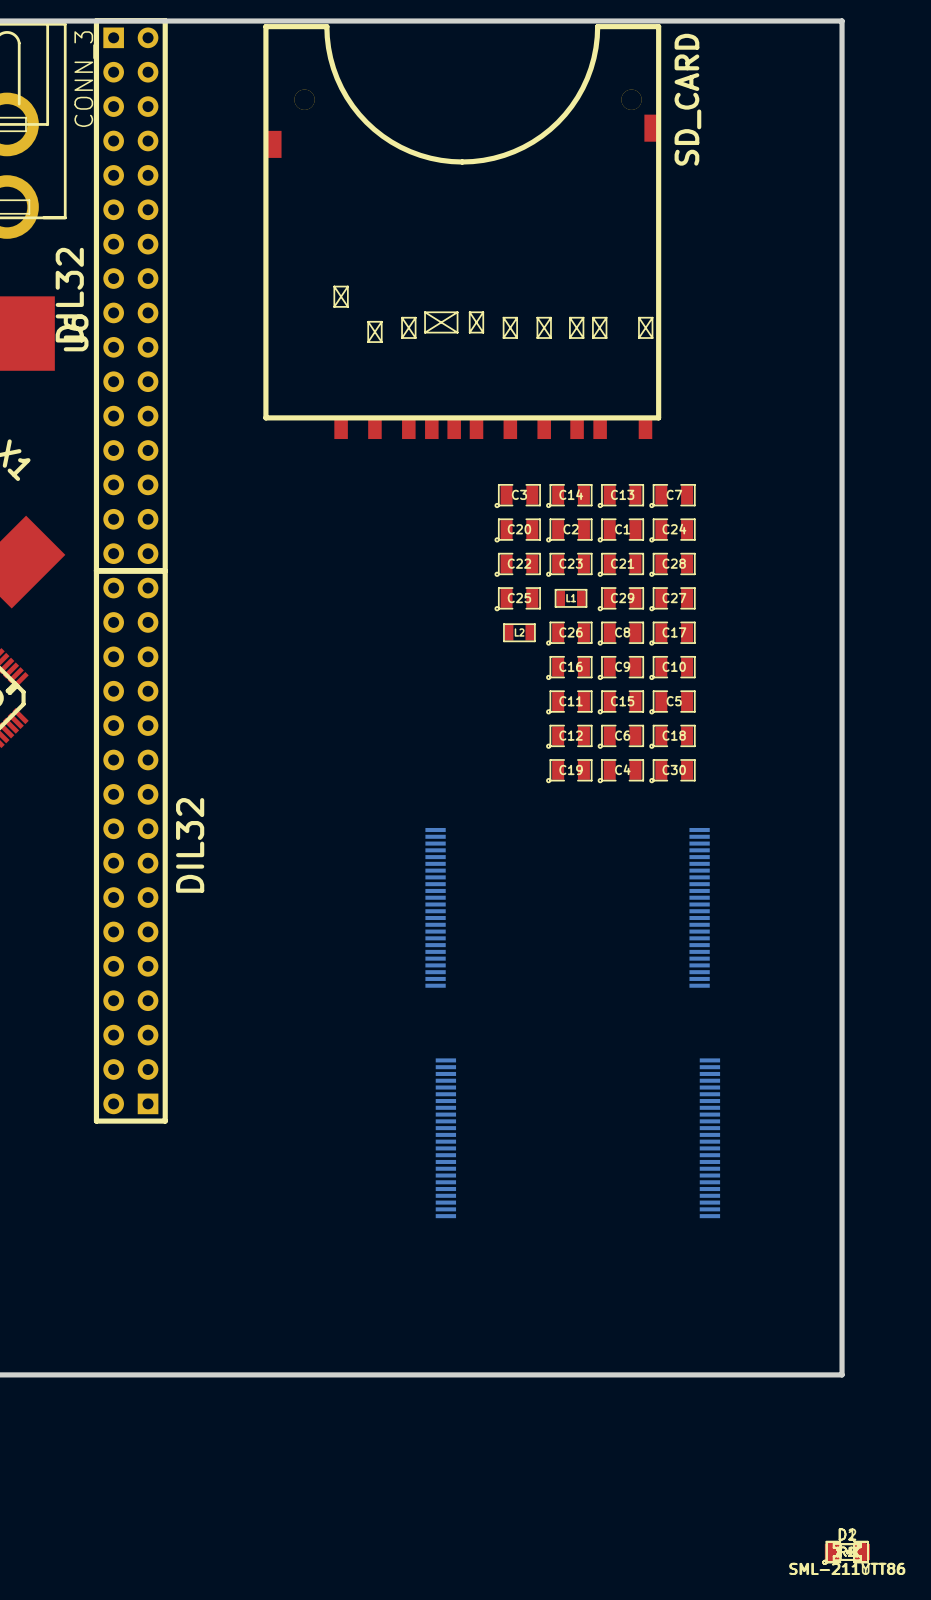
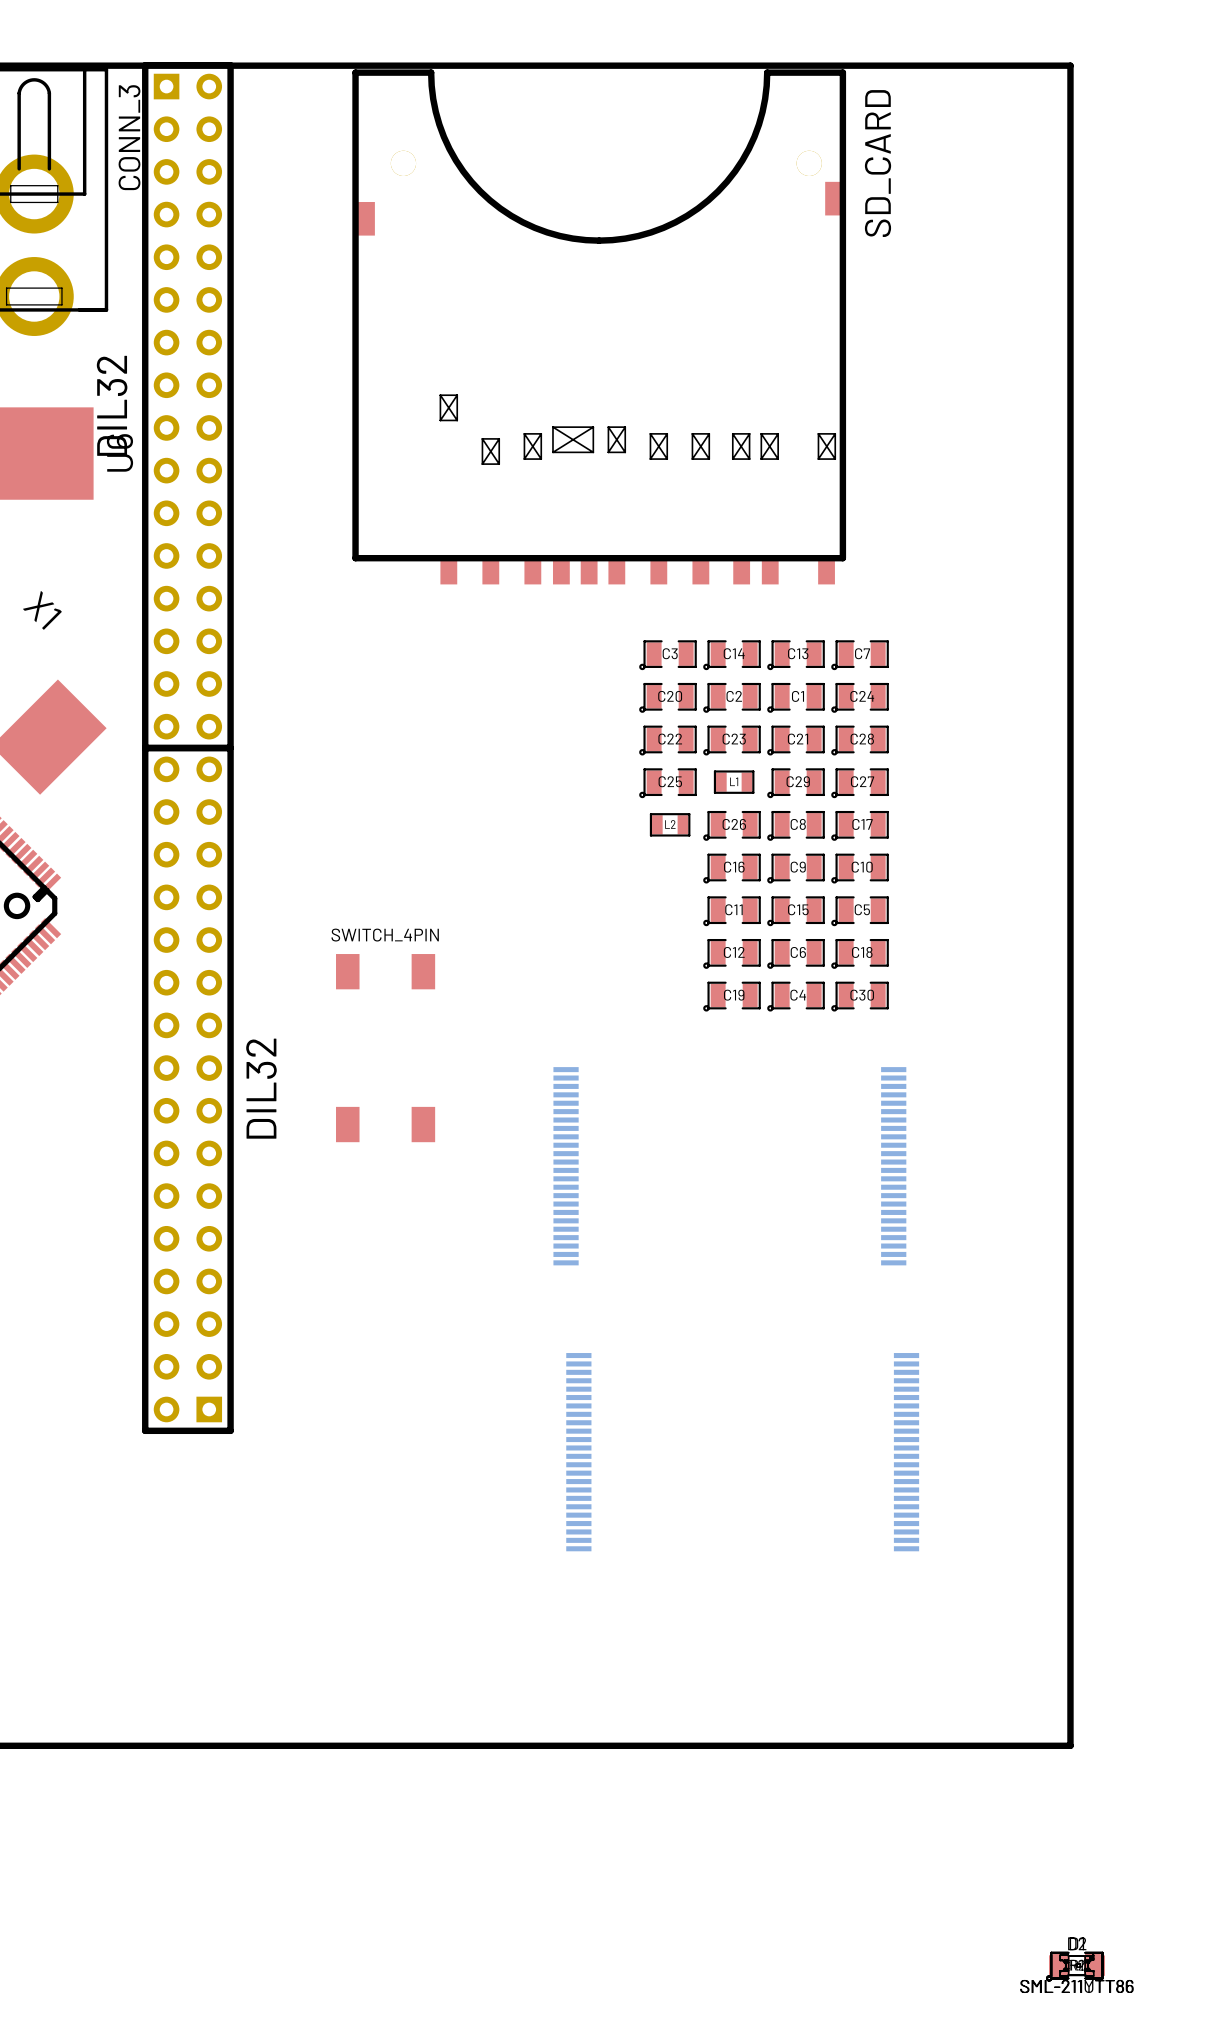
part: none -> SWITCH_4PIN (385, 1048)

